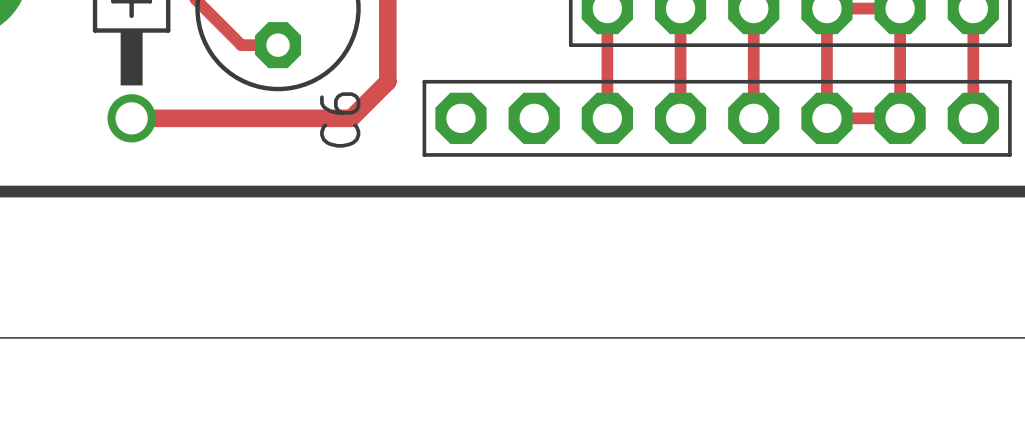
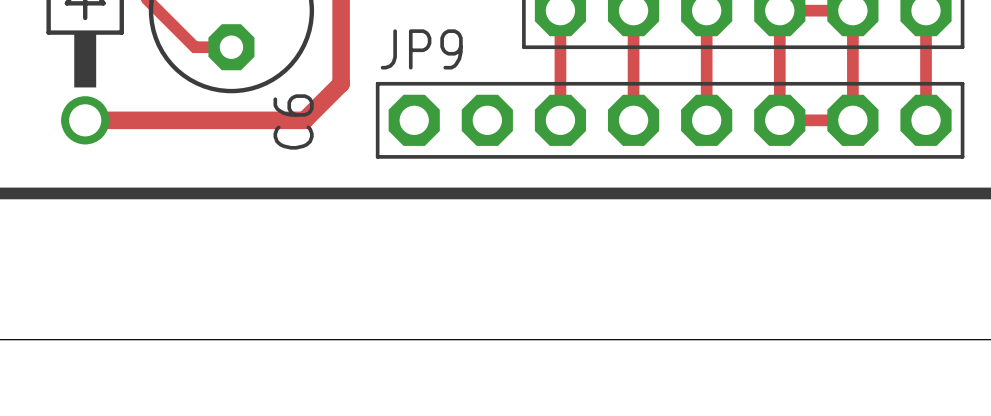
JP9 name: none -> JP9 (421, 49)

